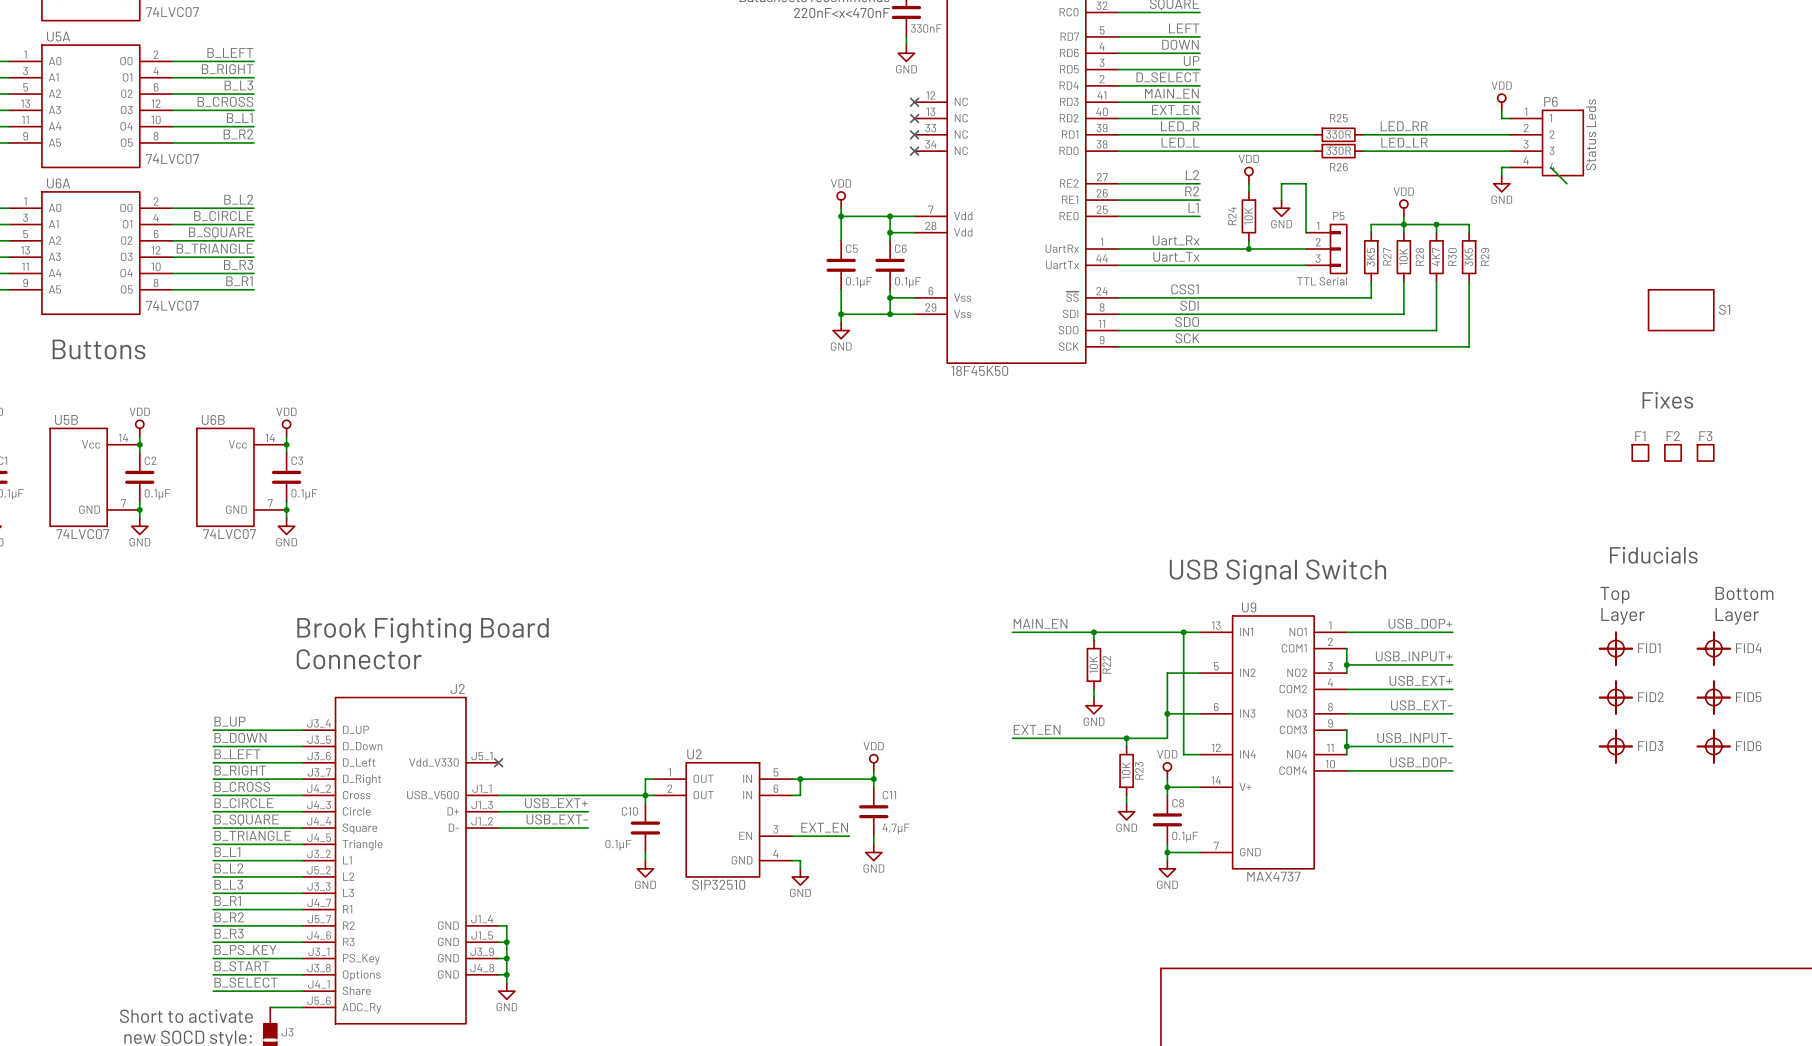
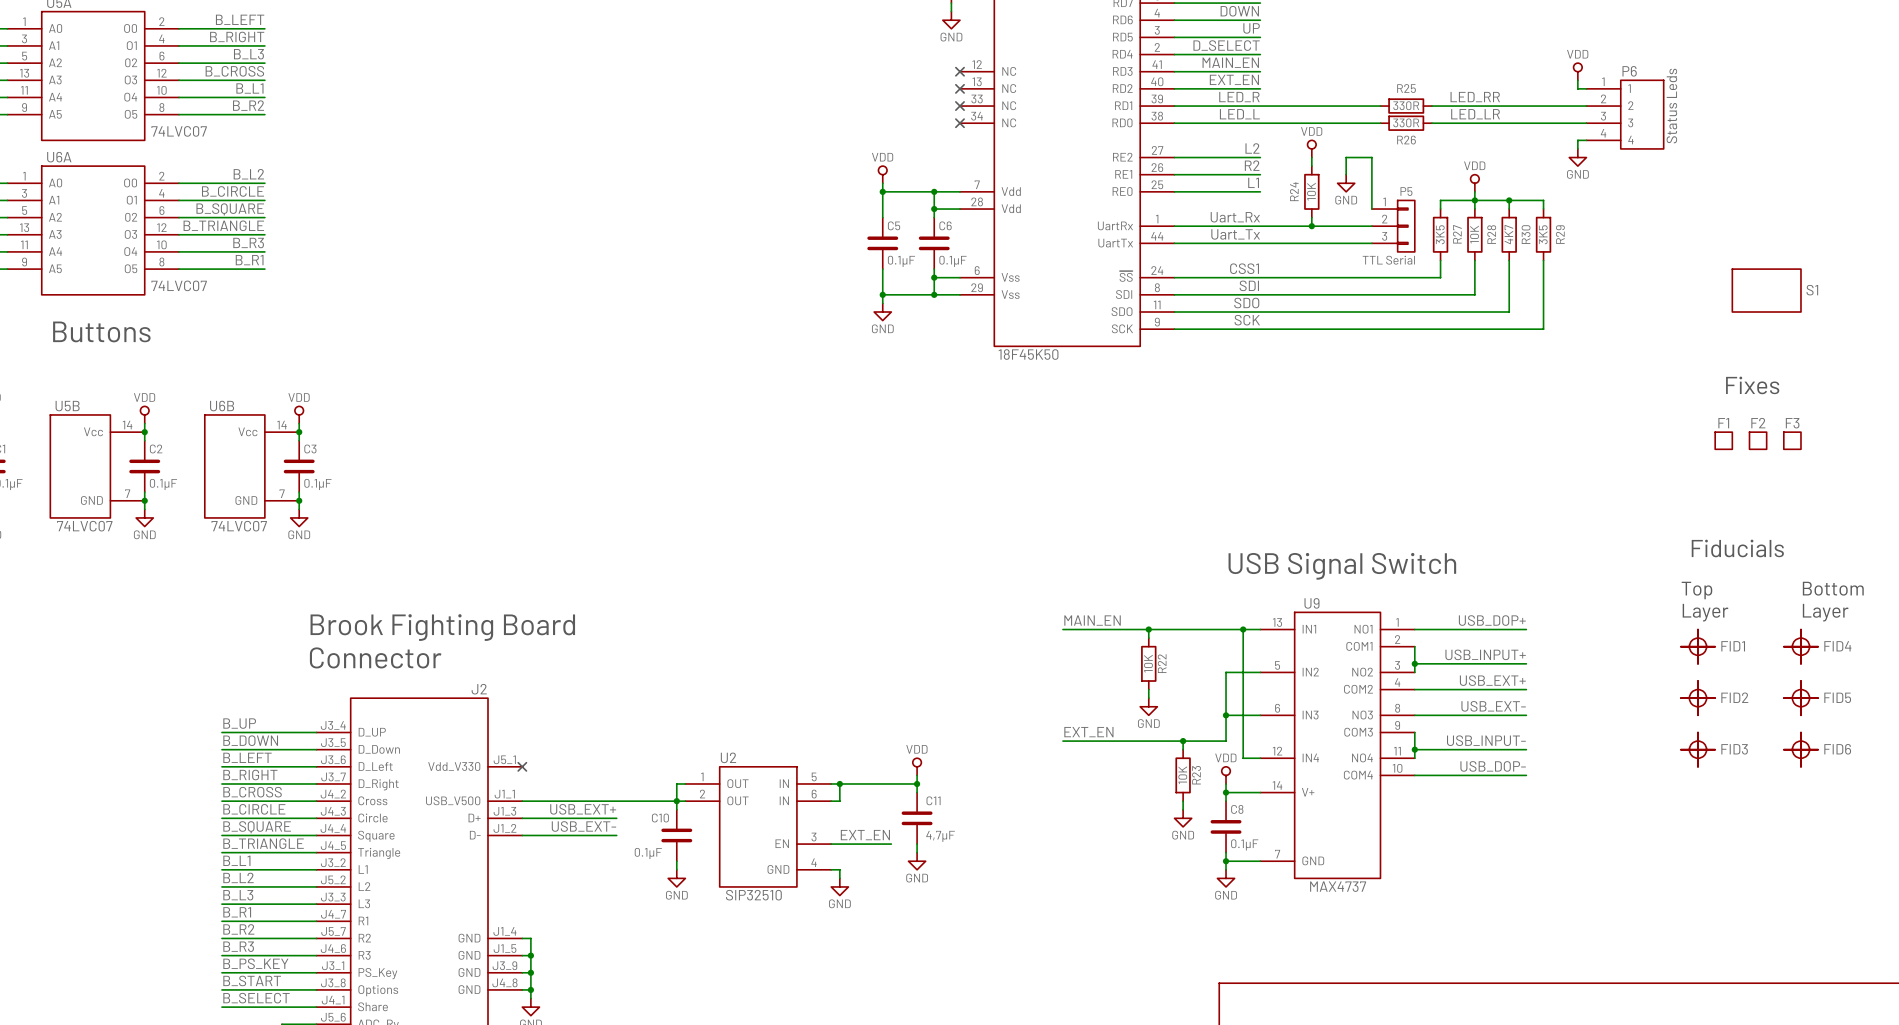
wire: (1550, 167) (1566, 183) -> none

